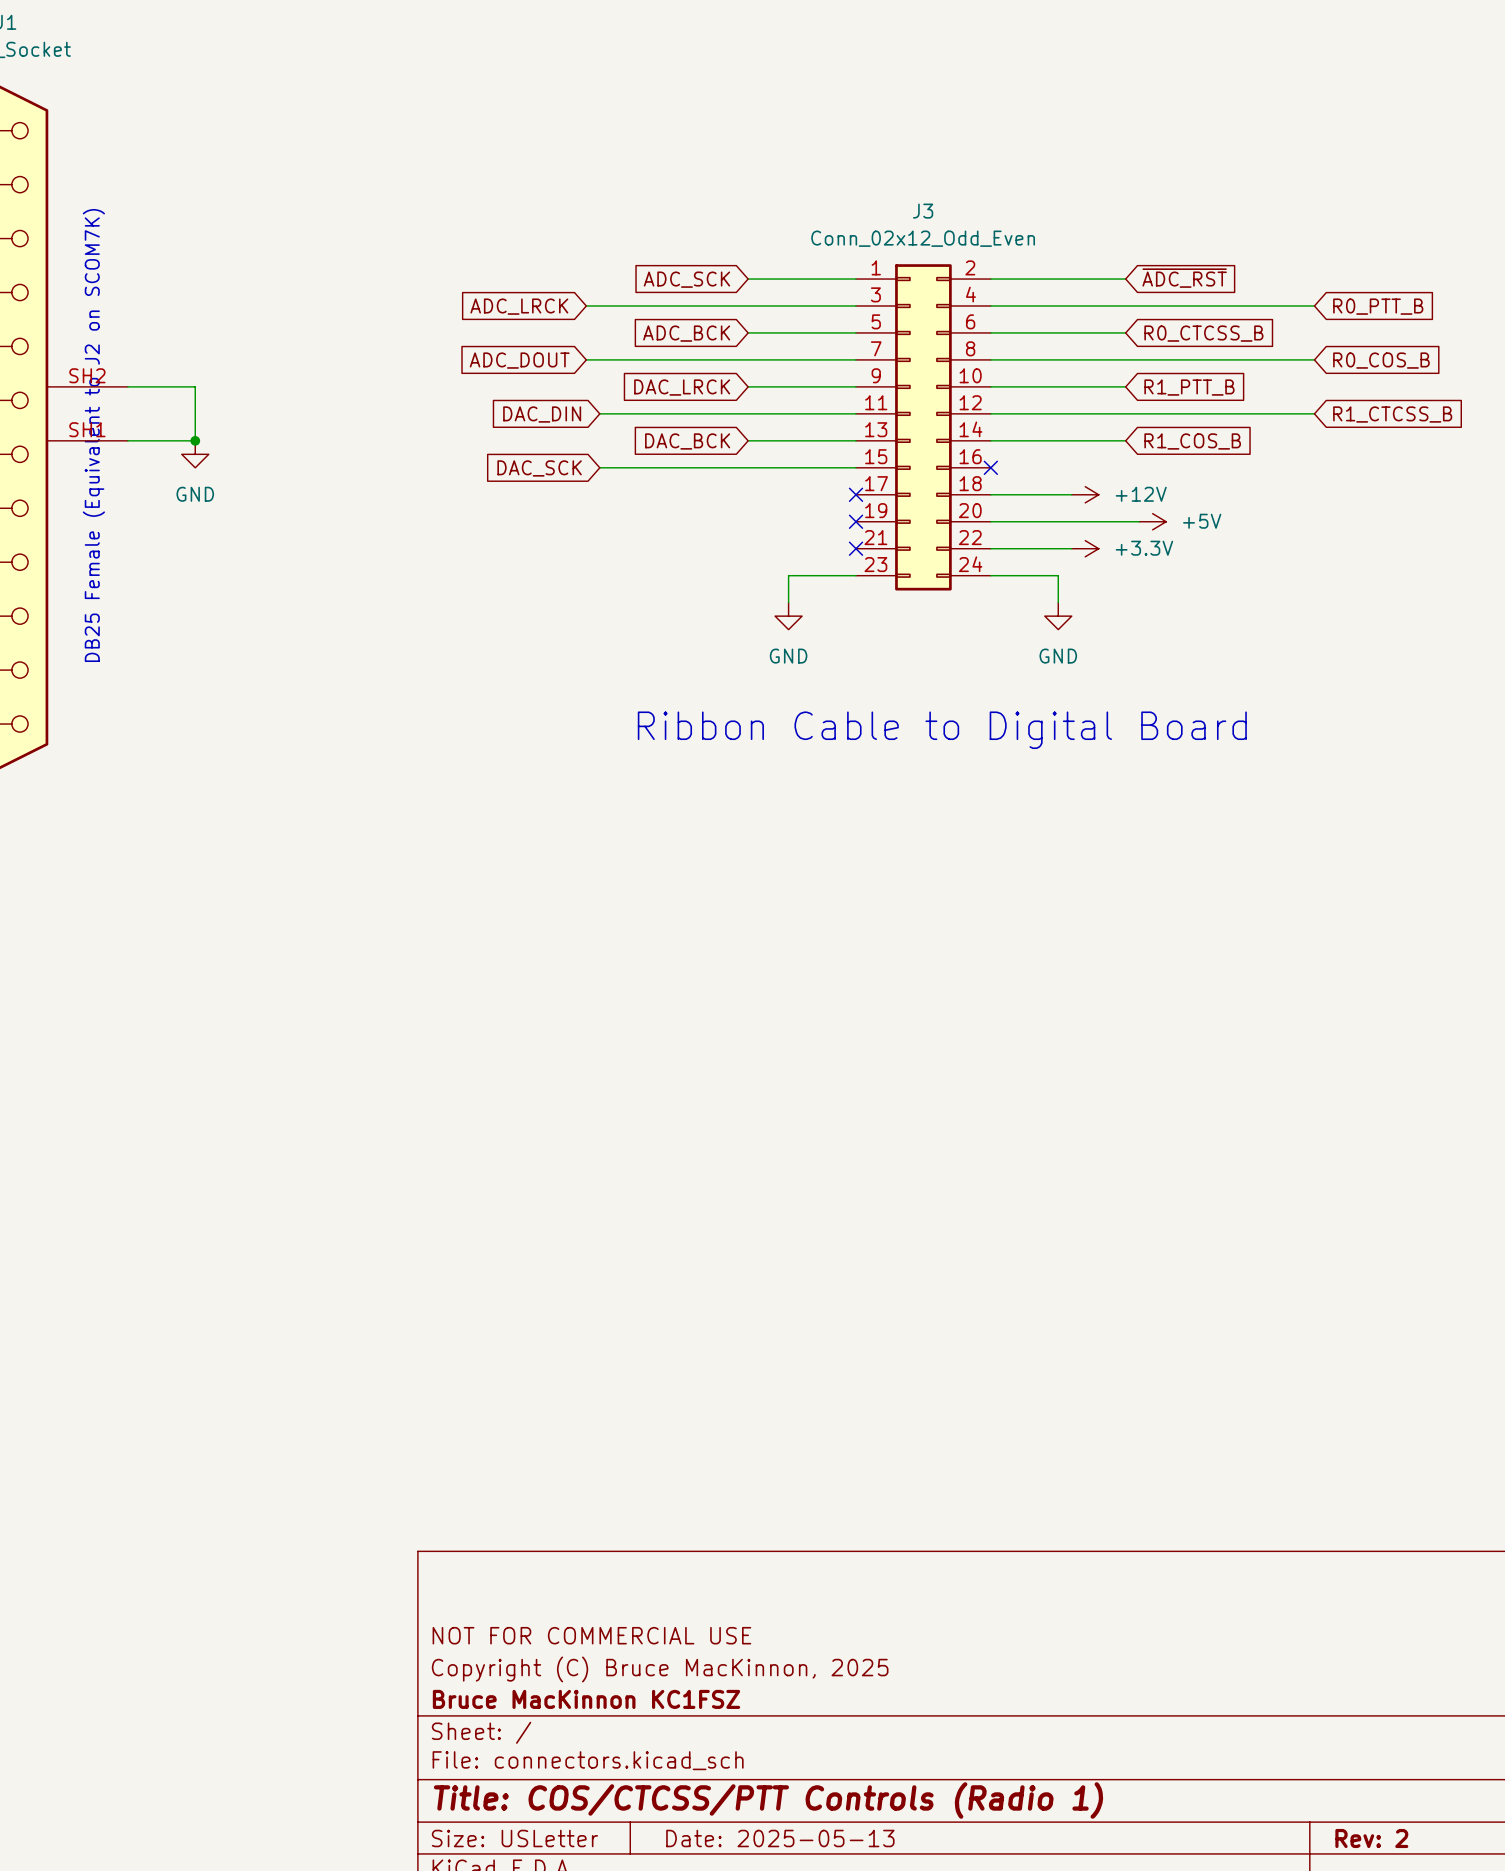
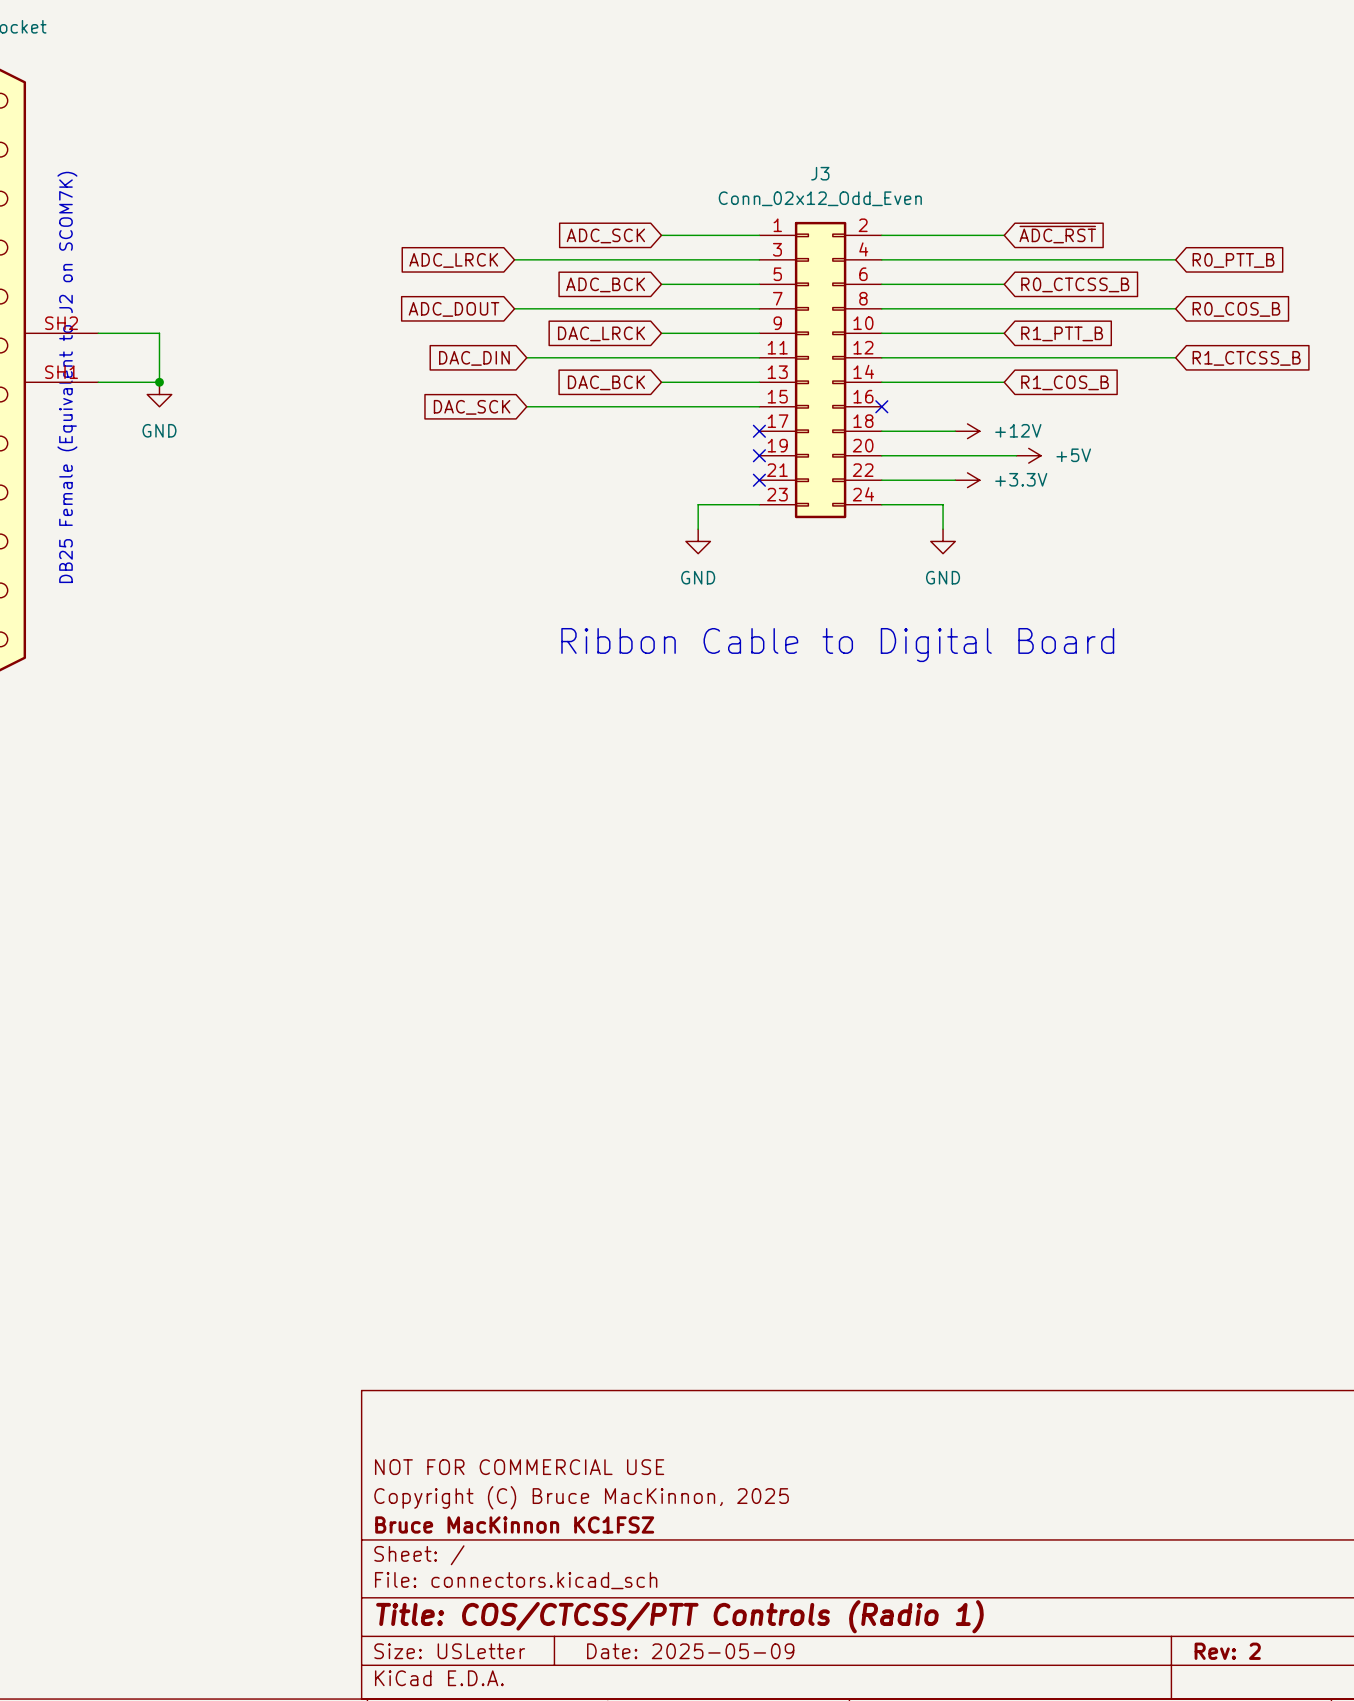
title block: Date: 2025-05-13 (780, 1838) -> Date: 2025-05-09 (690, 1651)

